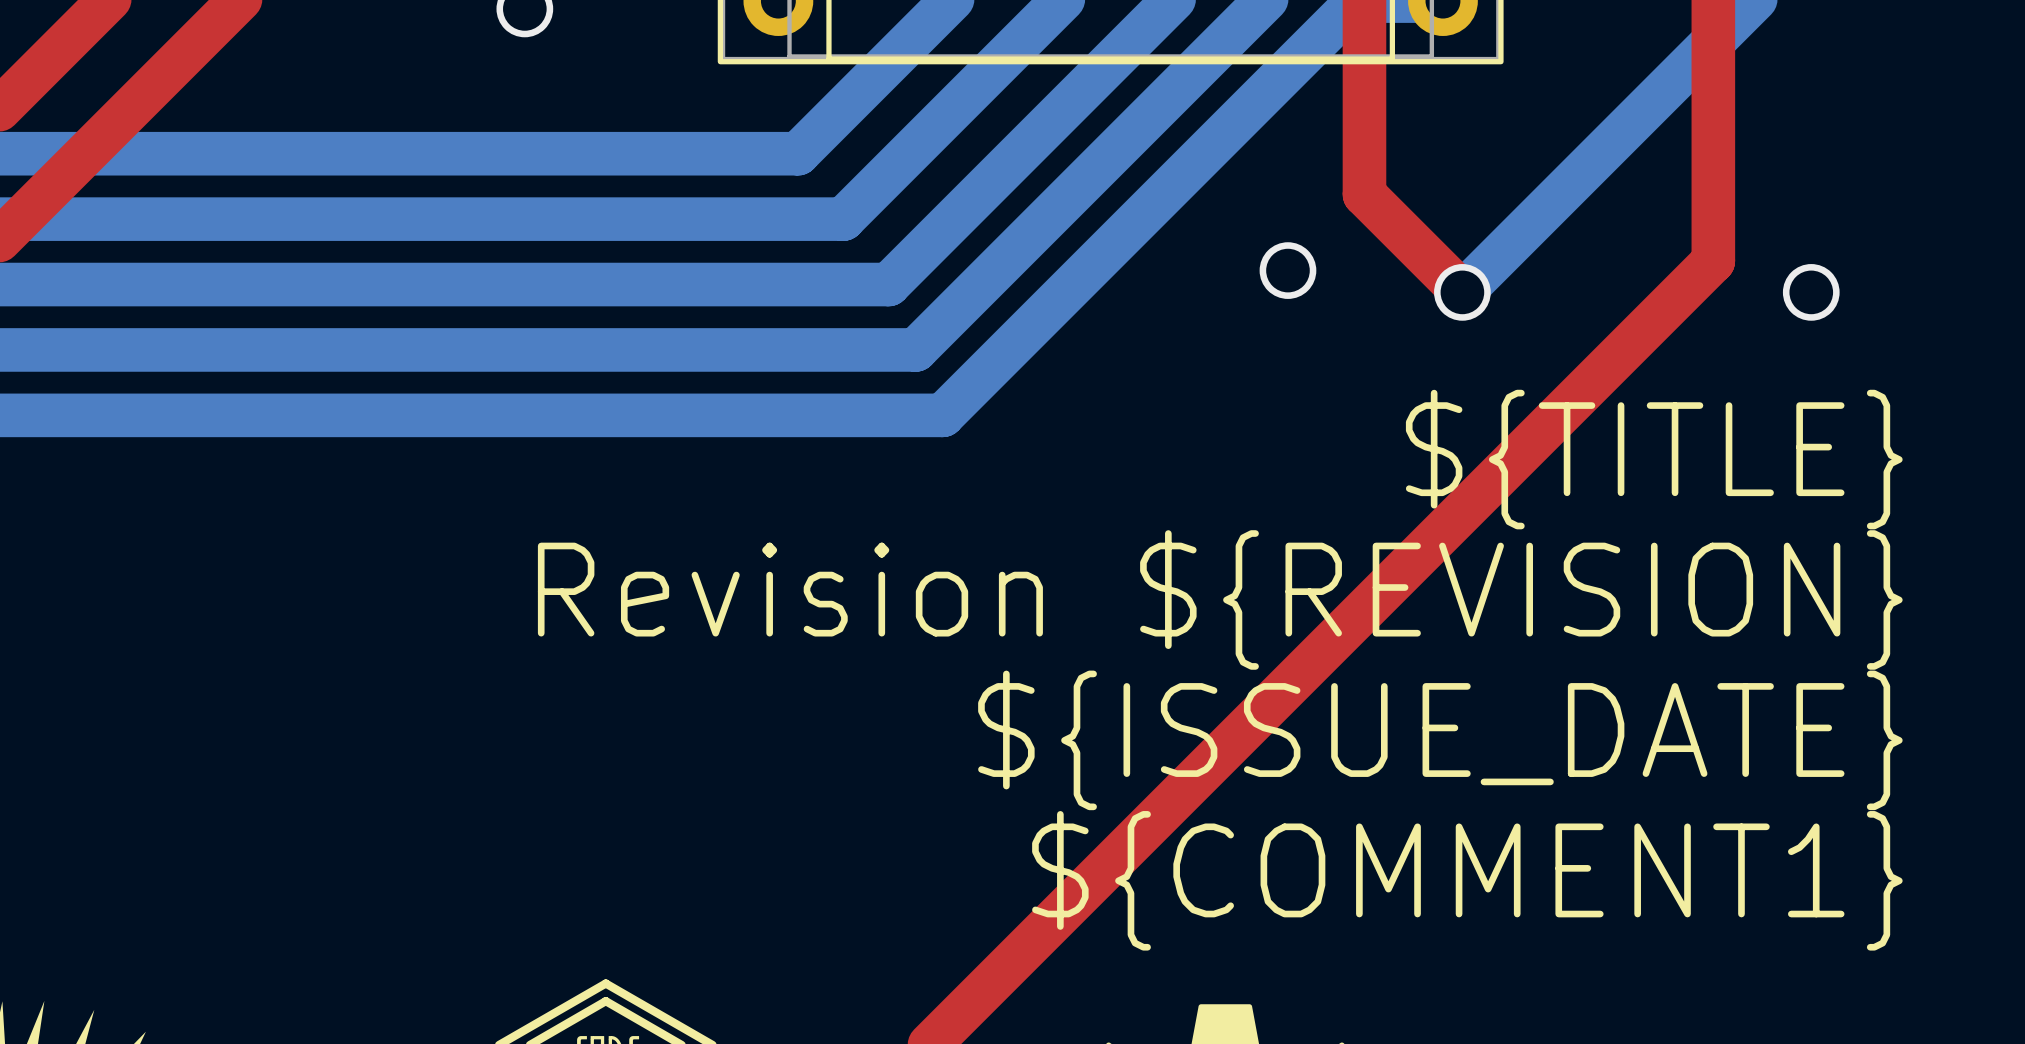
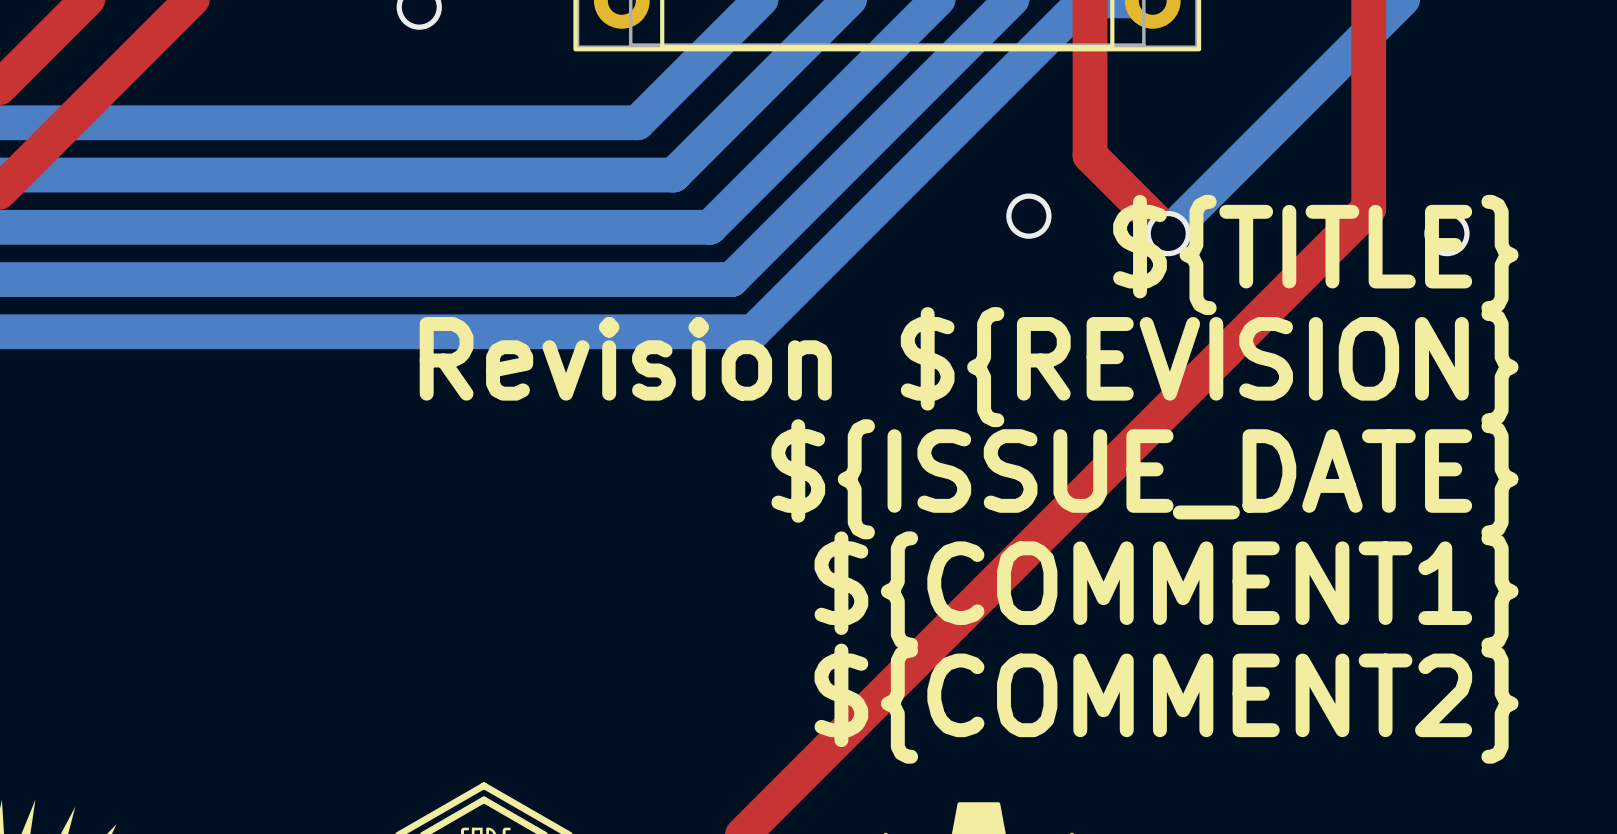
text: none -> ${TITLE} (1315, 254)
text: ${TITLE} (1654, 459) -> Revision ${REVISION} (969, 367)
text: Revision ${REVISION} (1220, 599) -> ${ISSUE_DATE} (1144, 479)
text: ${ISSUE_DATE} (1440, 740) -> ${COMMENT1} (1166, 591)
text: ${COMMENT1} (1467, 880) -> ${COMMENT2} (1166, 703)

